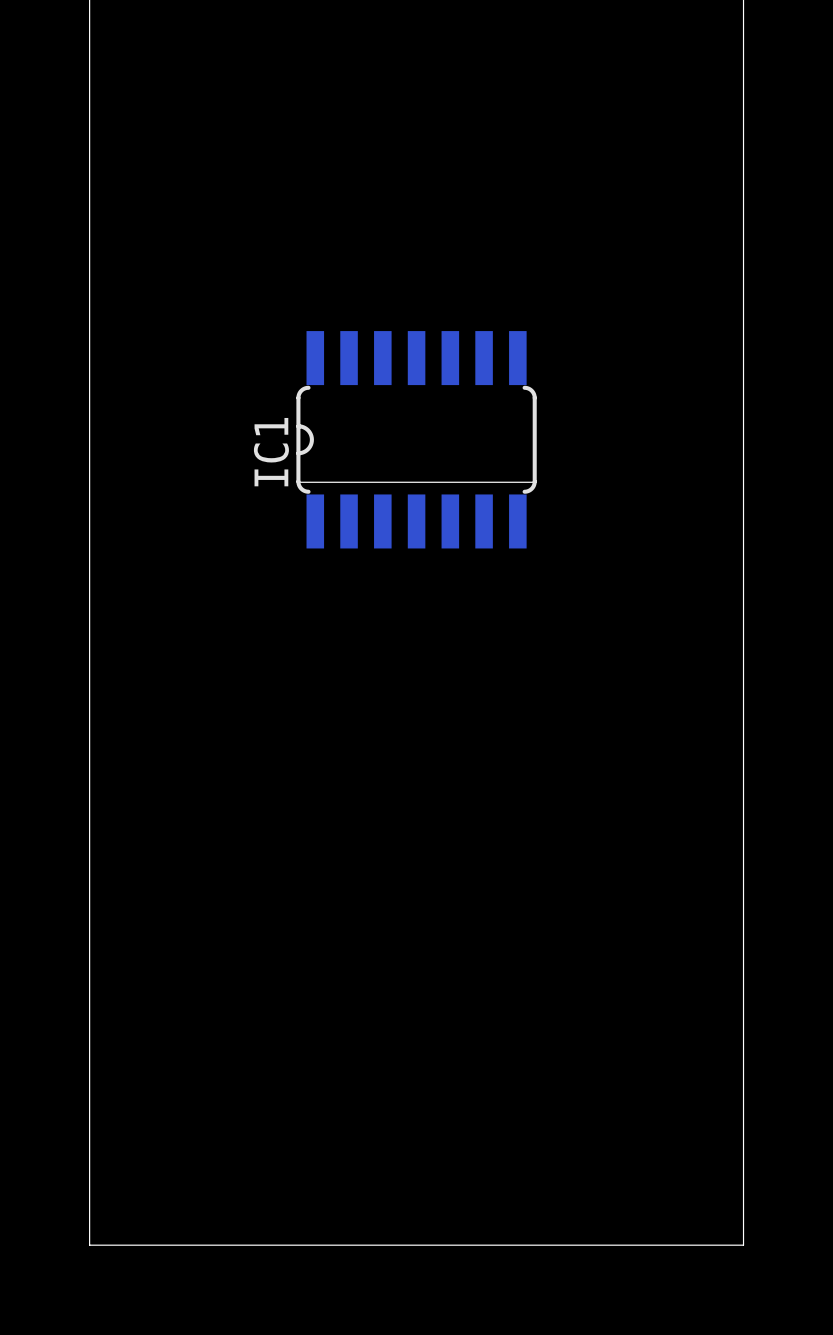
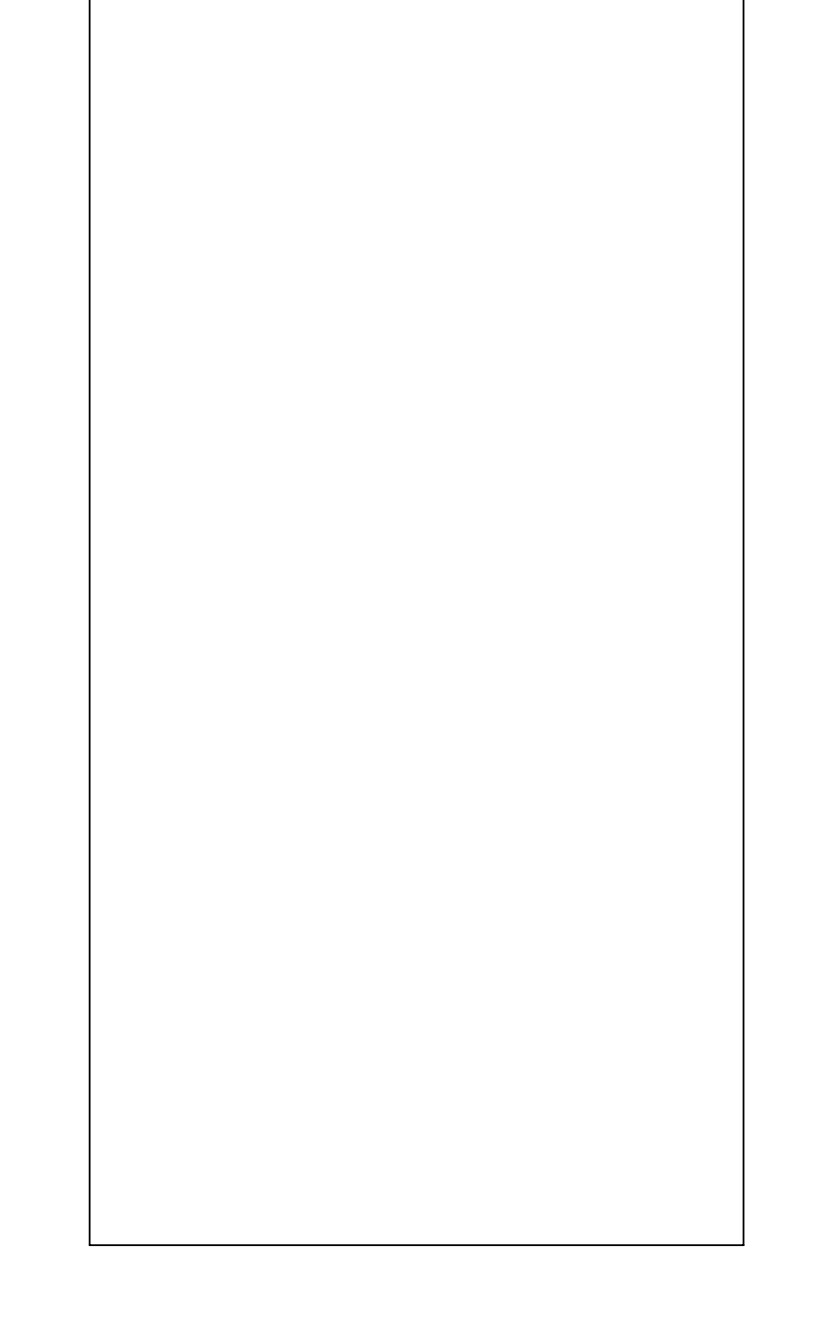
IC1: (416, 439) -> none

